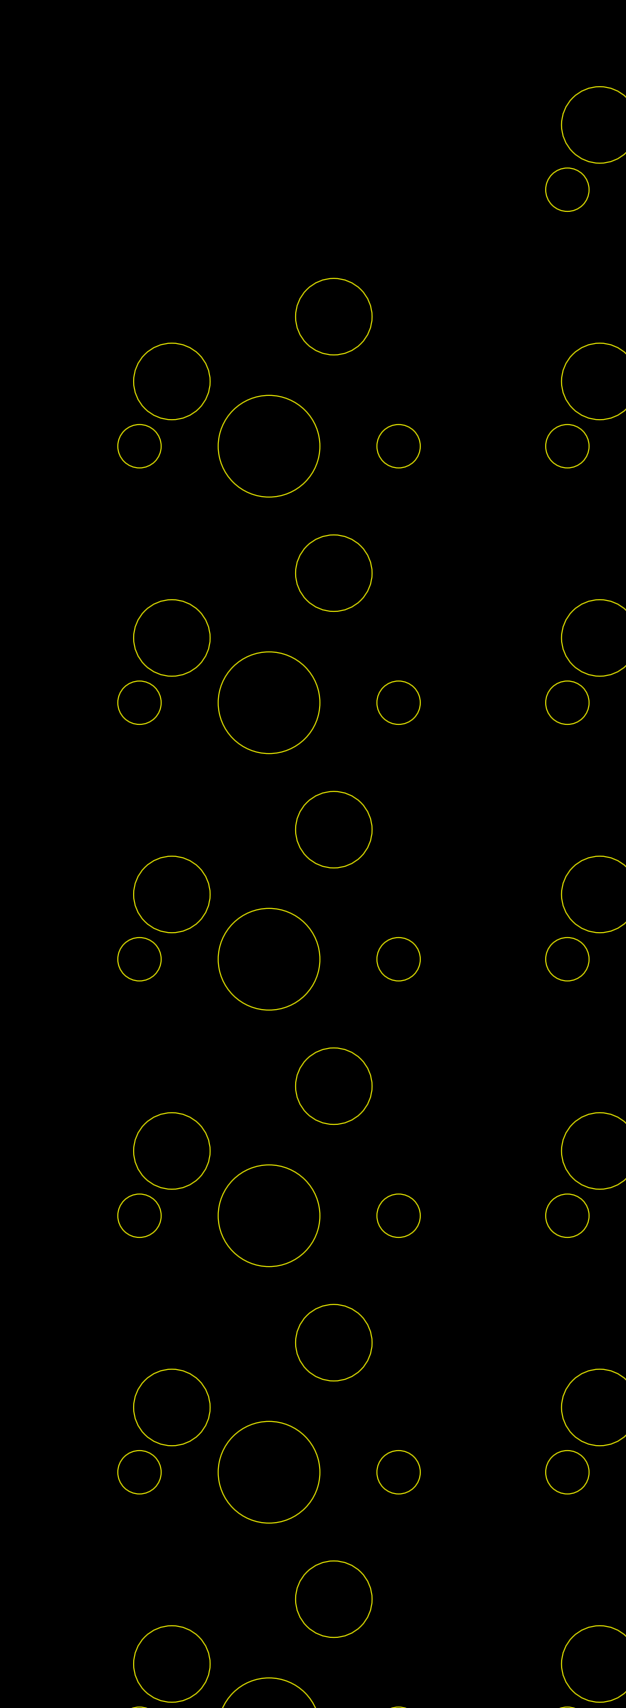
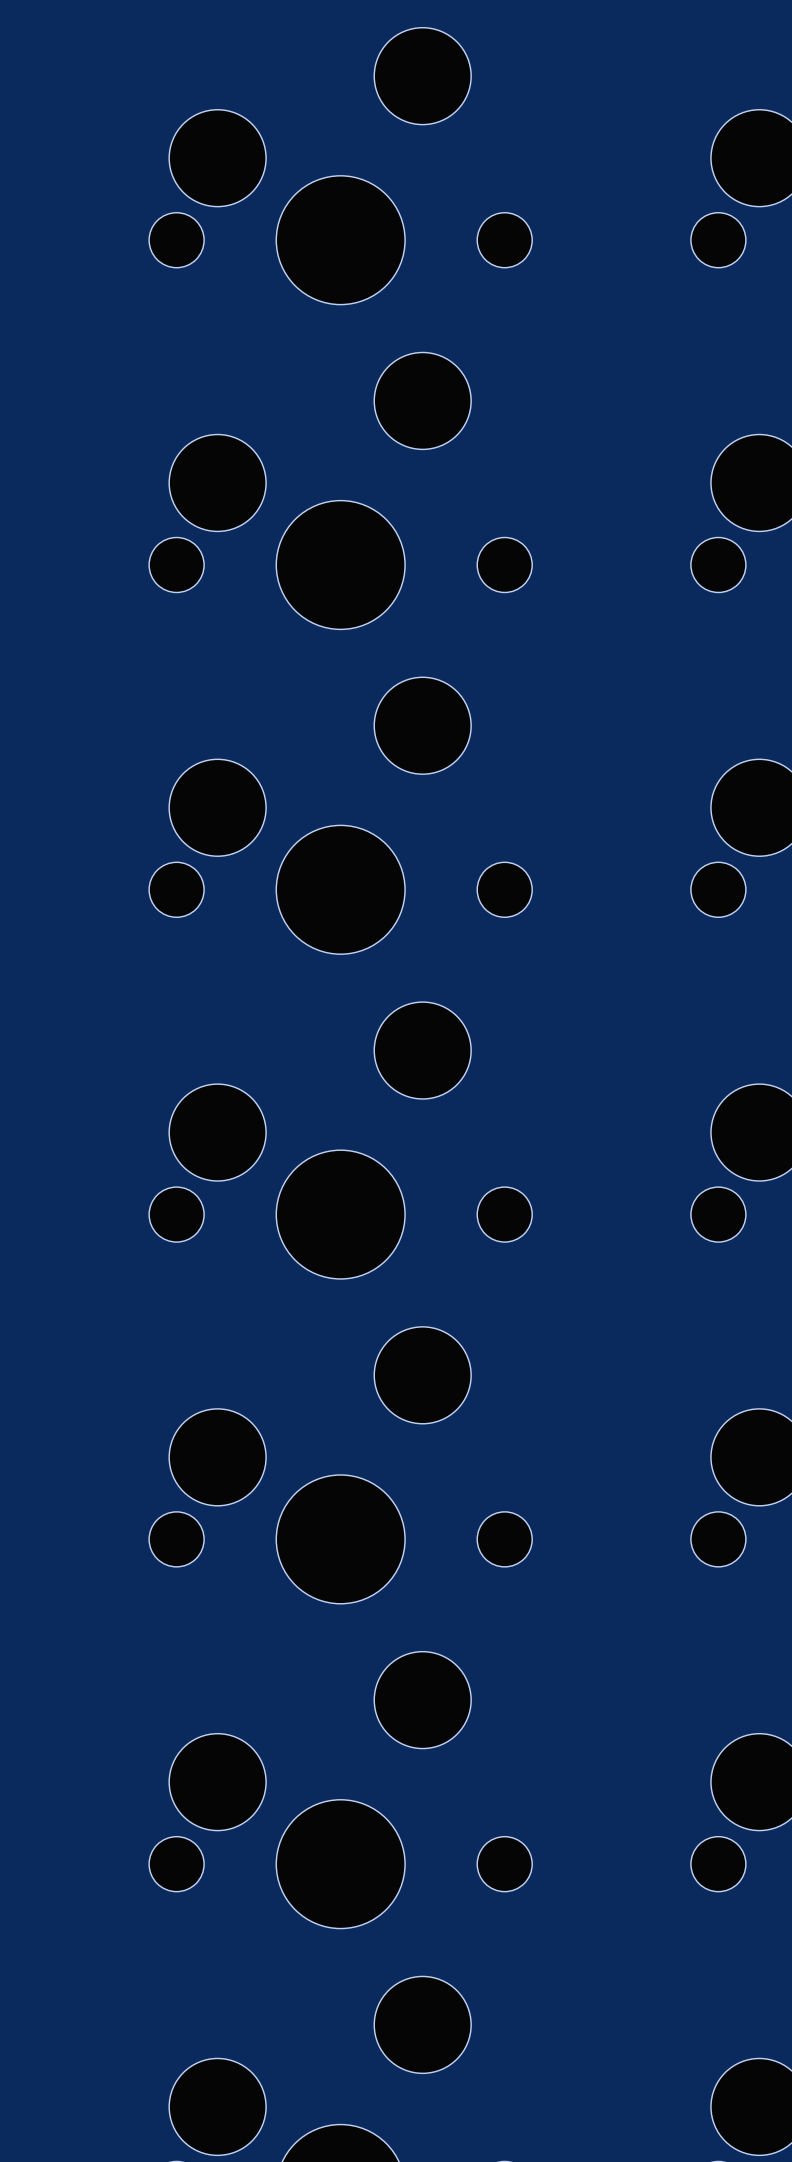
part: none -> (340, 166)

